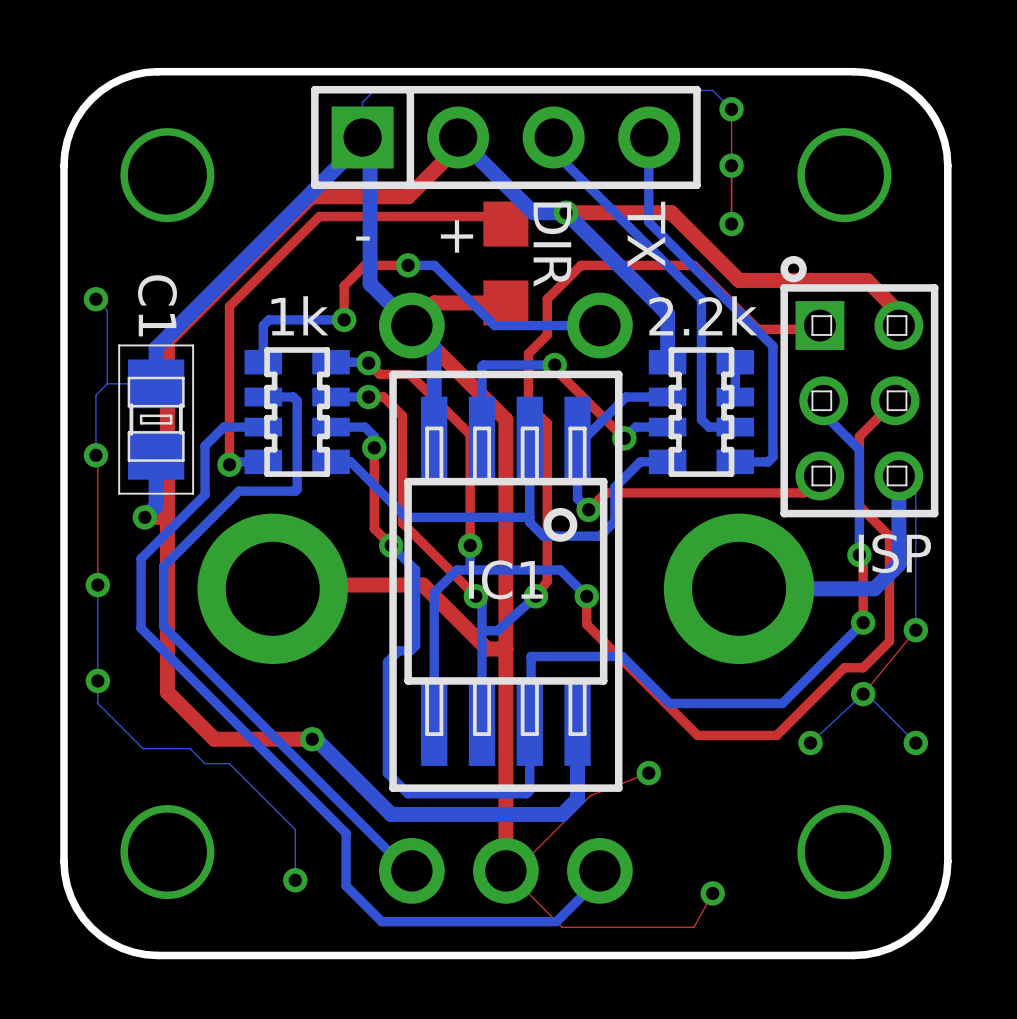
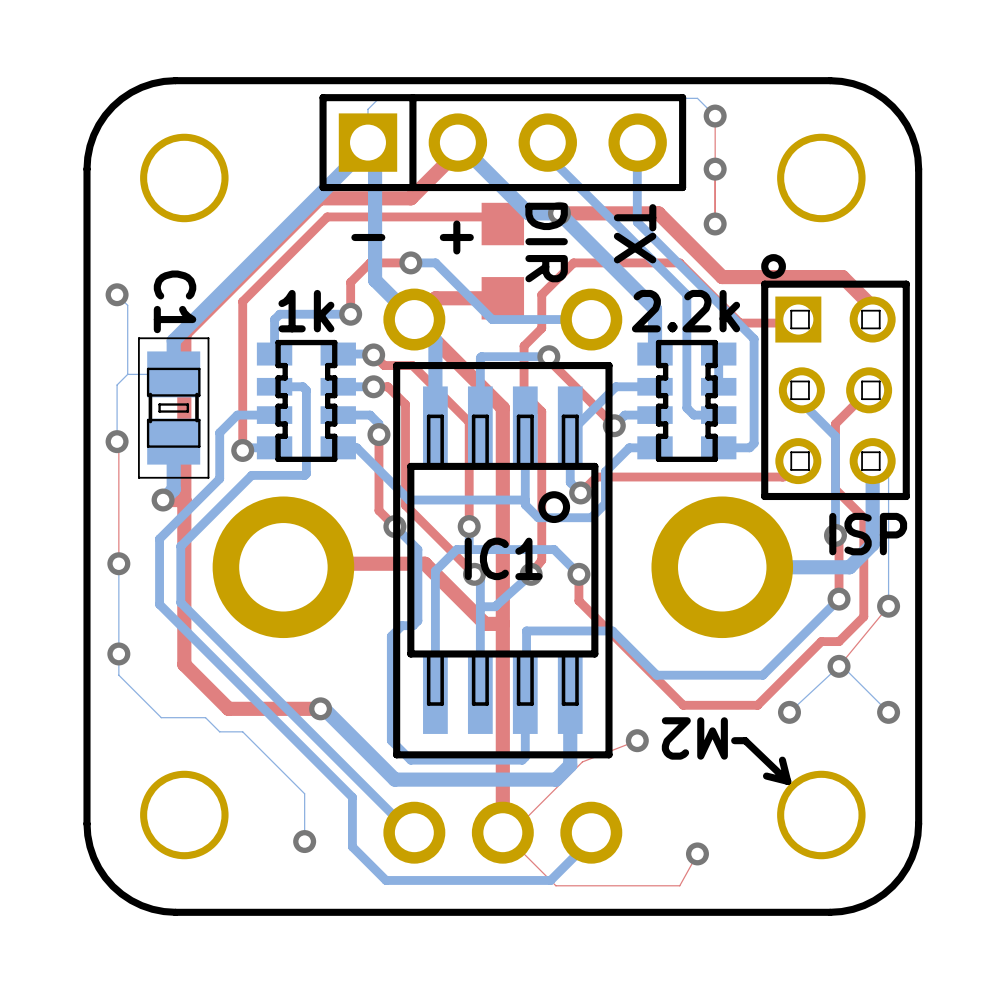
text: none -> M2 (694, 738)
line: none -> (734, 740) (745, 740) (787, 781)
line: none -> (782, 760) (787, 781)
line: none -> (766, 776) (787, 781)

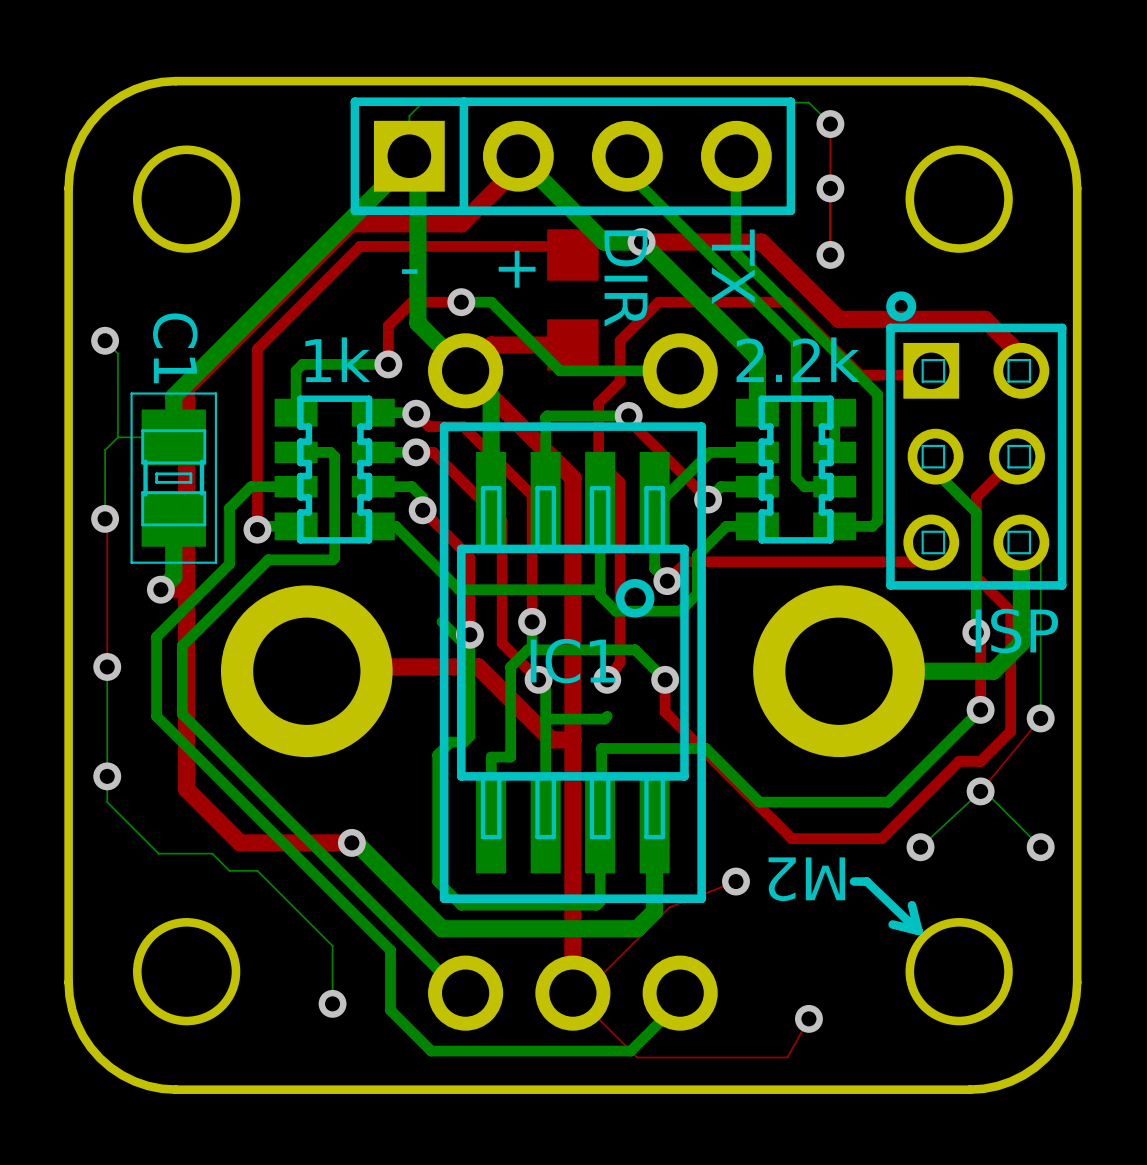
top track: (405, 404) (405, 505) (444, 544) -> (454, 473) (502, 521) (502, 643)
top track: (378, 434) (378, 510) (394, 526) -> (422, 510) (469, 557) (469, 634)
via position: (394, 526) -> (469, 634)
bottom track: (465, 549) (456, 549) (435, 570) (435, 702) -> (527, 649) (510, 666) (510, 757) (491, 757) (491, 825)
bottom track: (531, 574) (495, 606) -> (607, 716) (604, 719) (563, 719)

